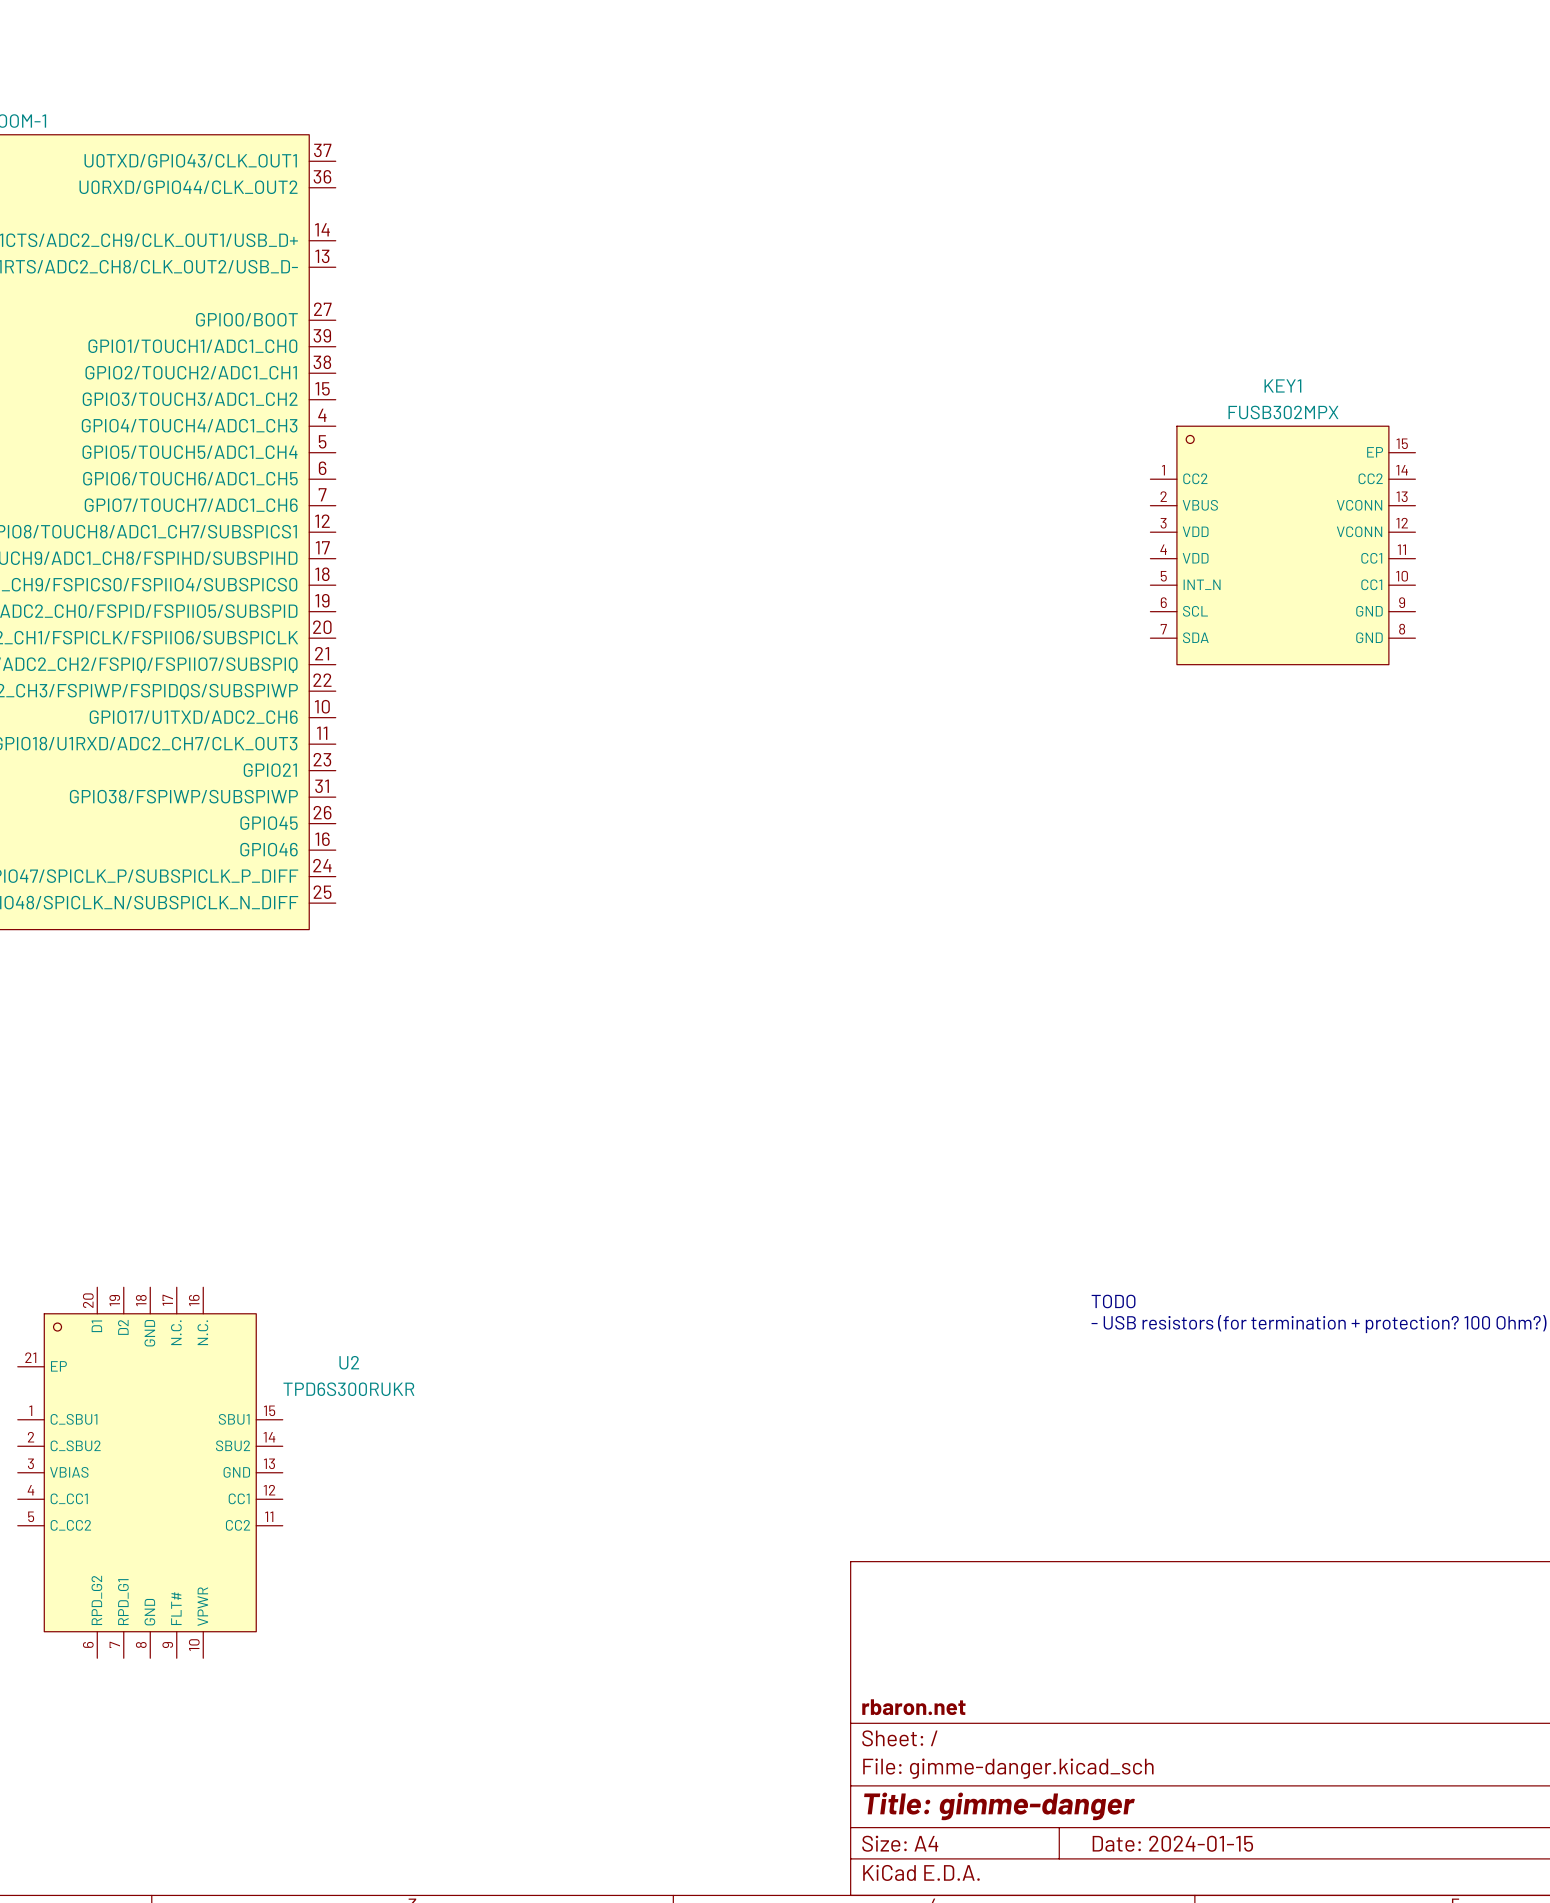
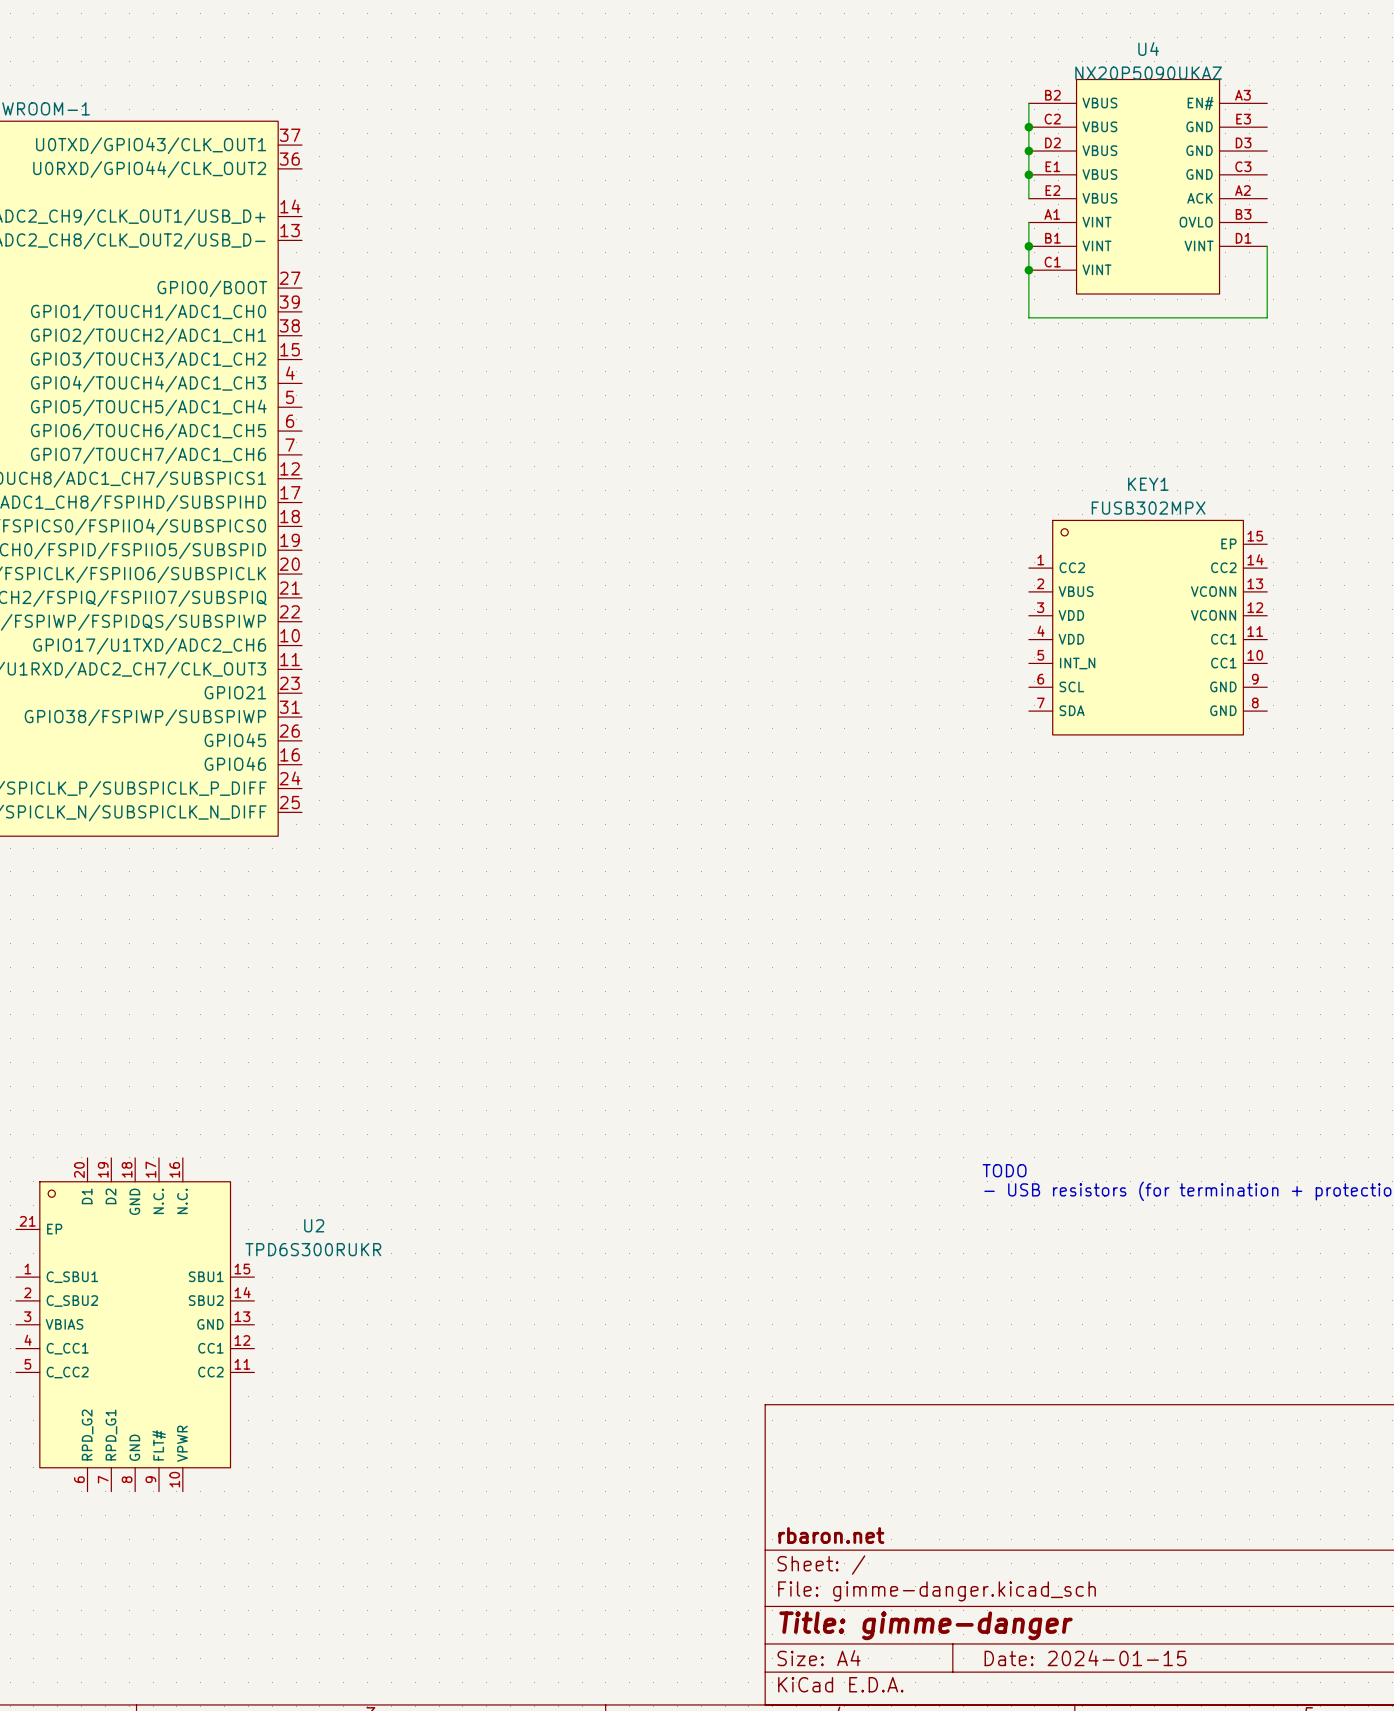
wire: none -> (1028, 103) (1028, 198)
junction: none -> (1028, 127)
junction: none -> (1028, 151)
junction: none -> (1028, 174)
U4: none -> NX20P5090UKAZ (1148, 186)
wire: none -> (1028, 222) (1028, 317) (1267, 317) (1267, 246)
junction: none -> (1028, 246)
junction: none -> (1028, 270)
KEY1 position: (1282, 545) -> (1148, 627)

